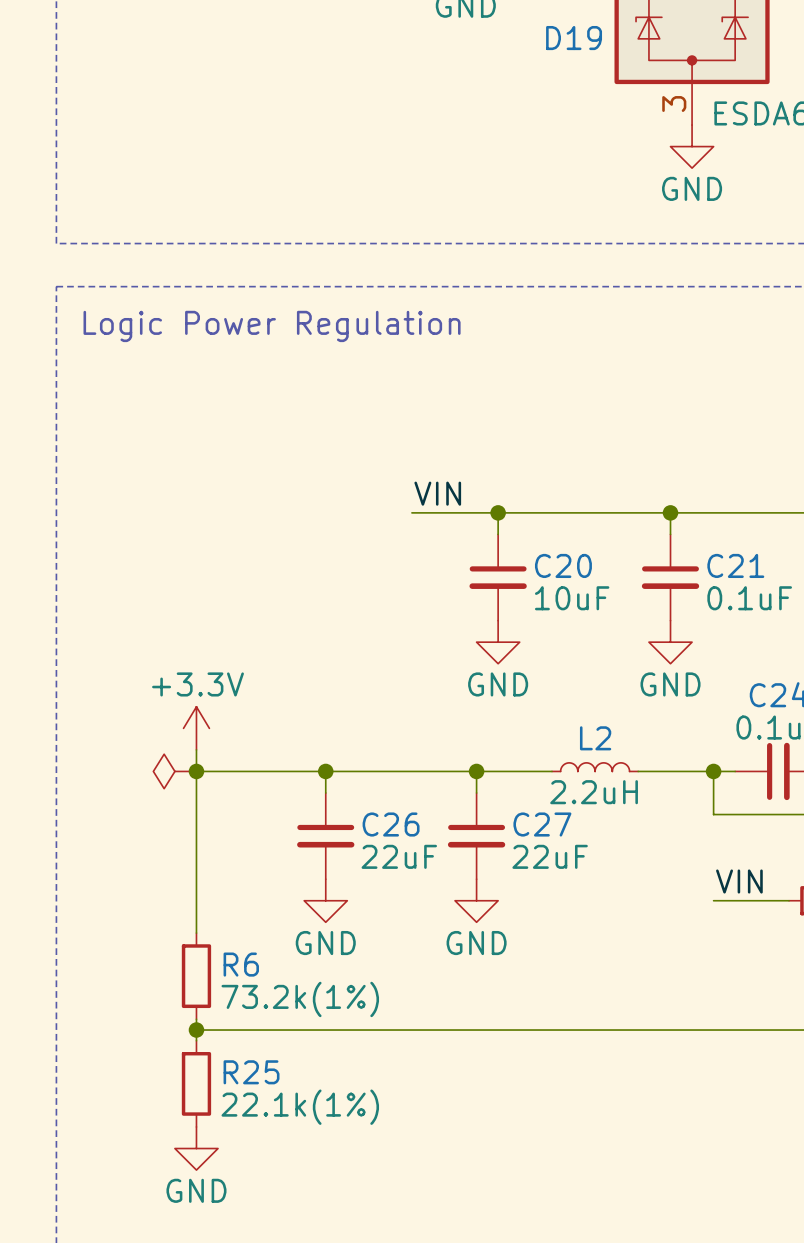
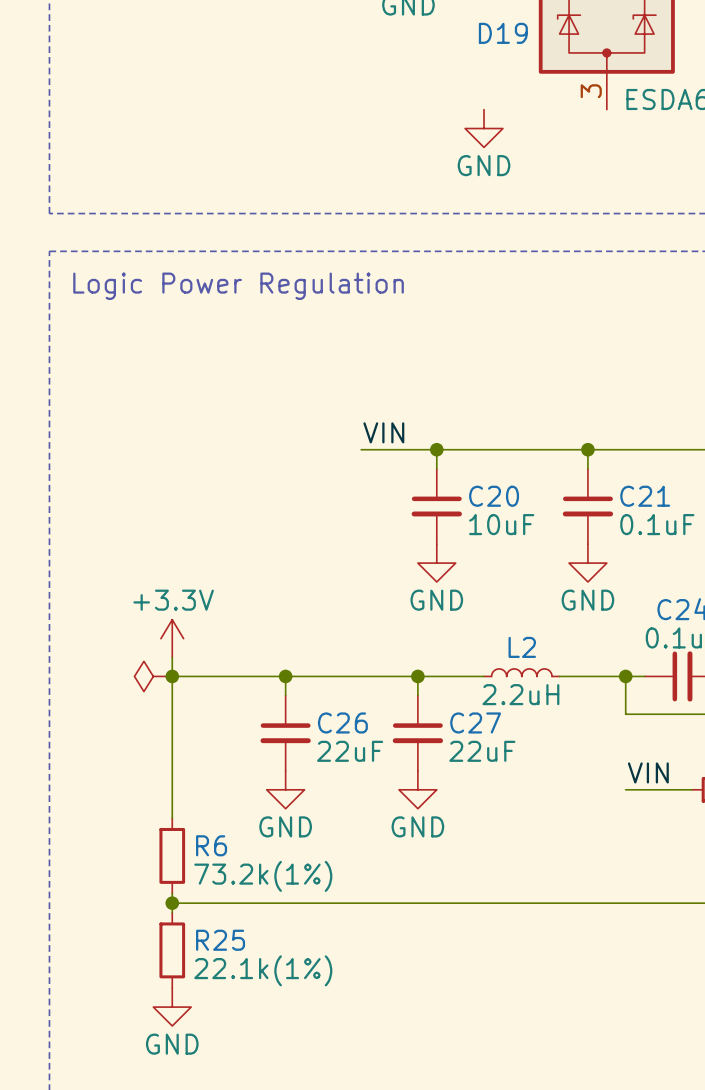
power symbol position: GND (692, 146) -> GND (484, 128)

